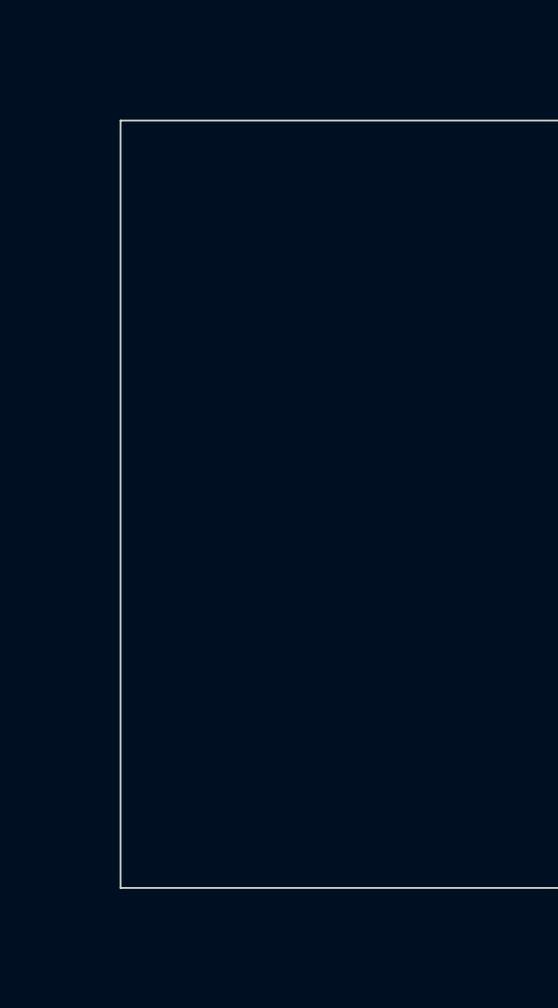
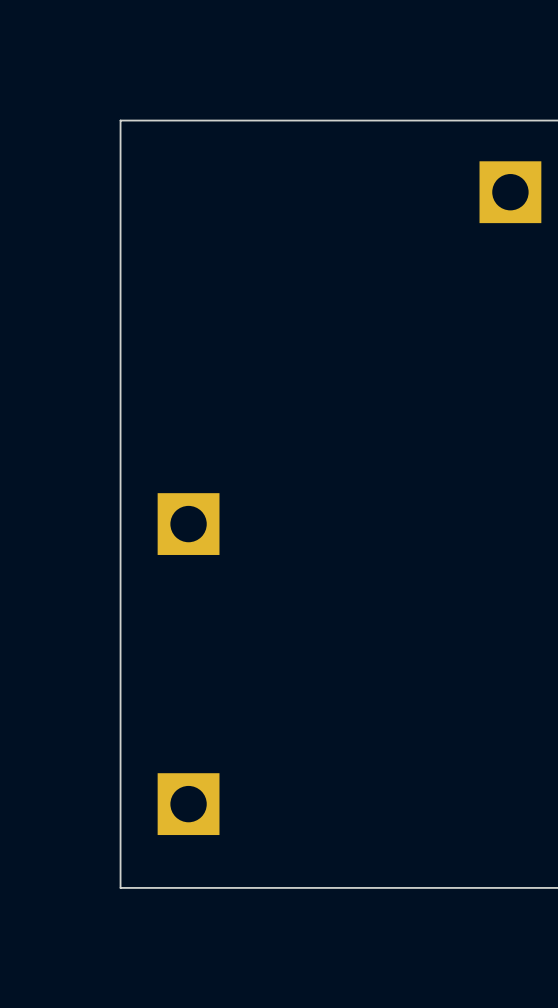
part: none -> (510, 192)
part: none -> (188, 524)
part: none -> (188, 804)

